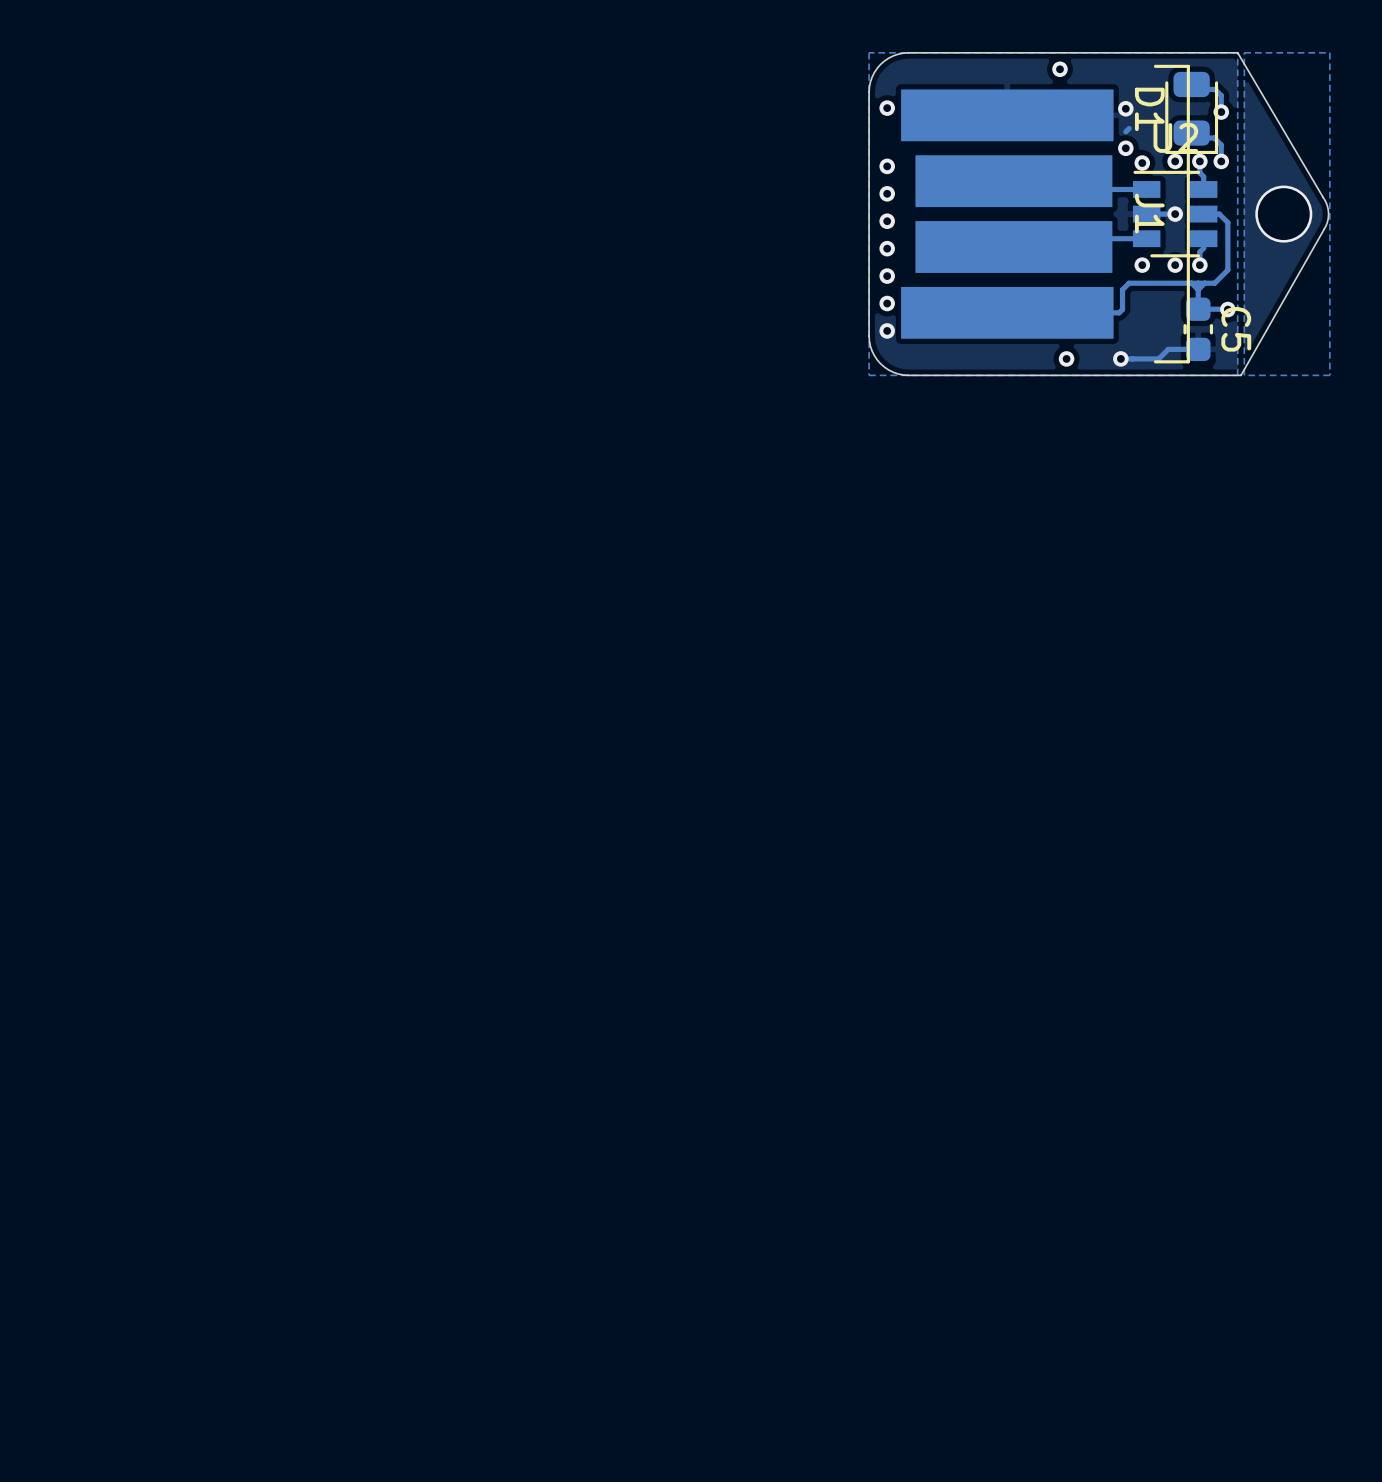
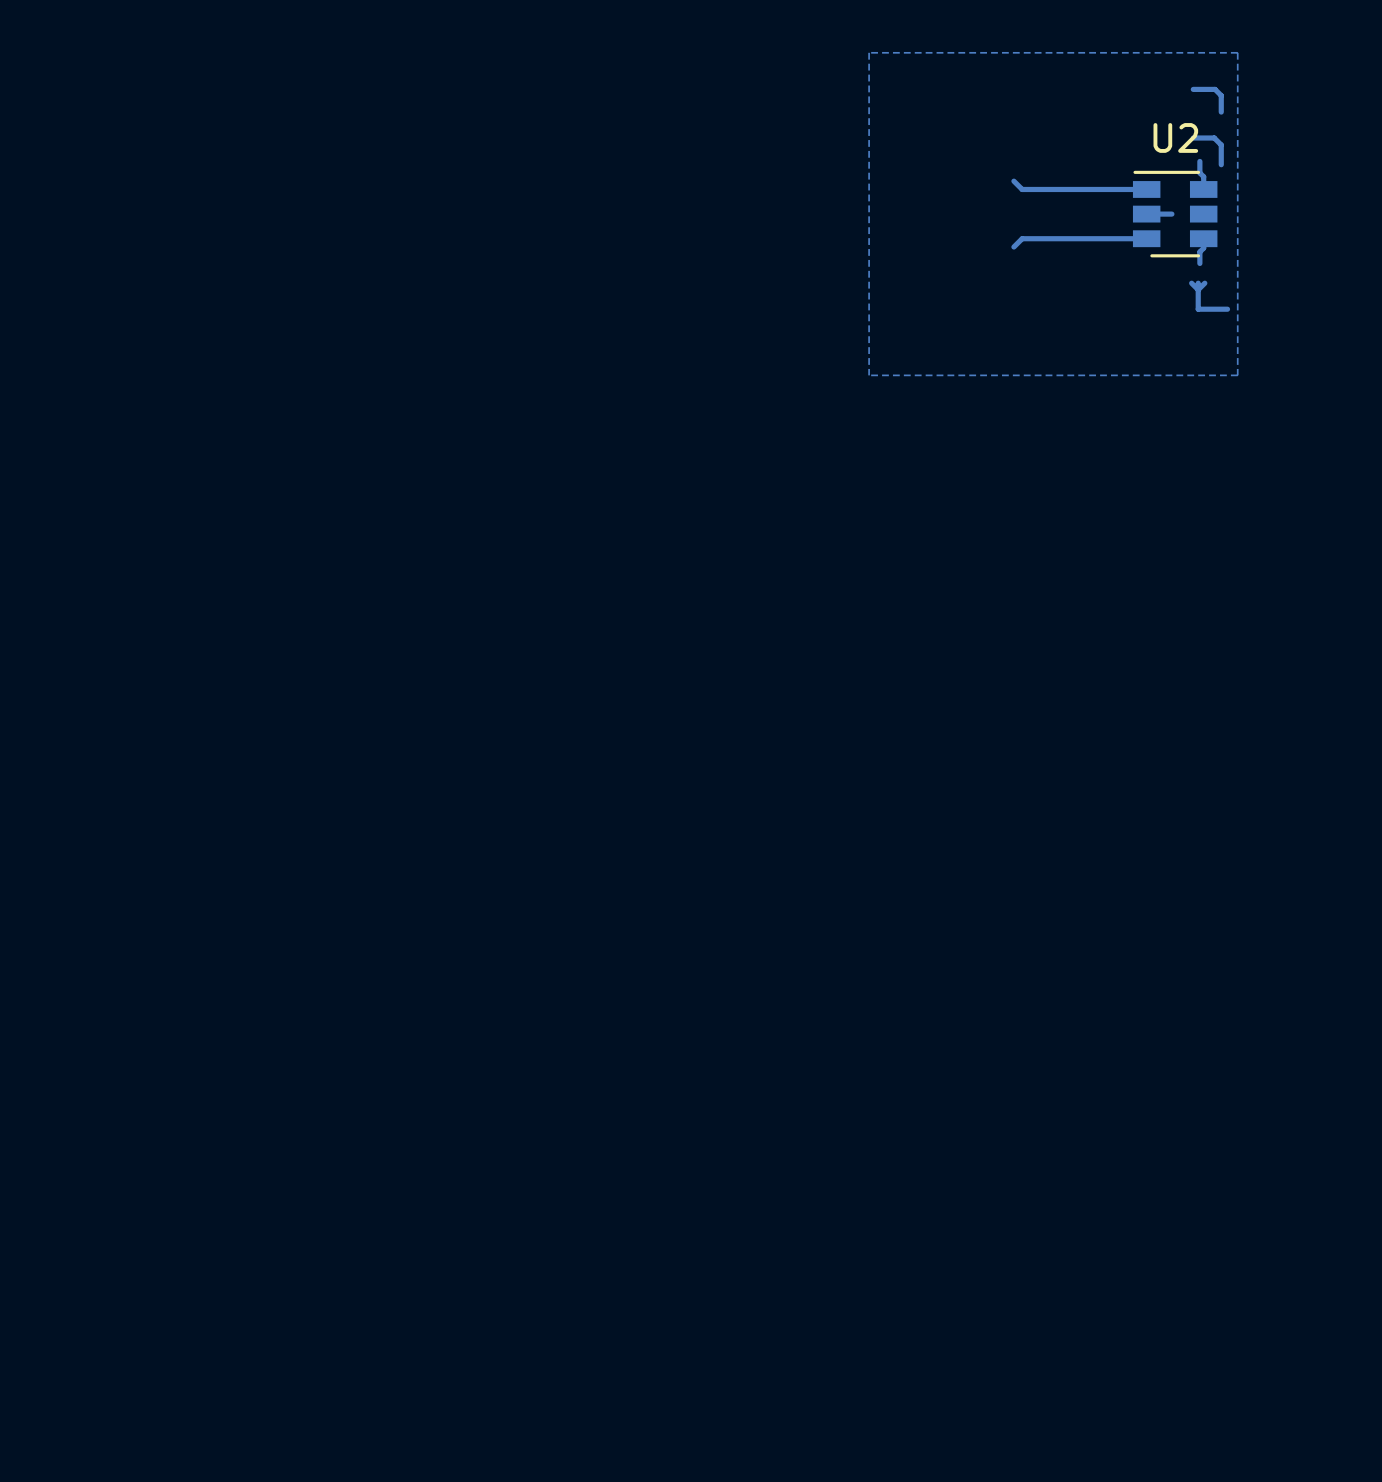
board edge: (1237, 52) (1325, 200) (1328, 213) (1325, 226) (1241, 375) (908, 375) (893, 372) (877, 359) (872, 350) (869, 335) (869, 92) (872, 77) (884, 60) (893, 55) (908, 52) (1237, 52) -> none
zone outline: (1329, 52) (1244, 52) (1244, 375) (1329, 375) (1329, 52) -> none
via: (1059, 69) -> none
via: (887, 108) -> none
via: (1125, 108) -> none
D1: (1191, 112) -> none
via: (1221, 112) -> none
track: (1129, 128) (1125, 131) -> none
via: (1125, 148) -> none
via: (1175, 161) -> none
via: (1199, 161) -> none
via: (1221, 161) -> none
via: (1142, 163) -> none
via: (887, 166) -> none
via: (887, 193) -> none
J1: (1045, 214) -> none
via: (1175, 214) -> none
track: (1200, 214) (1219, 214) (1227, 222) (1227, 270) (1214, 283) (1129, 283) (1122, 289) (1122, 309) (1119, 312) (1007, 312) -> none
via: (1283, 214) -> none
via: (887, 221) -> none
via: (887, 248) -> none
via: (1142, 265) -> none
via: (1175, 265) -> none
via: (1199, 265) -> none
via: (887, 276) -> none
via: (887, 303) -> none
via: (1227, 309) -> none
C5: (1198, 329) -> none
via: (887, 330) -> none
track: (1198, 349) (1168, 349) (1158, 358) (1120, 358) -> none
via: (1066, 358) -> none
via: (1120, 358) -> none

